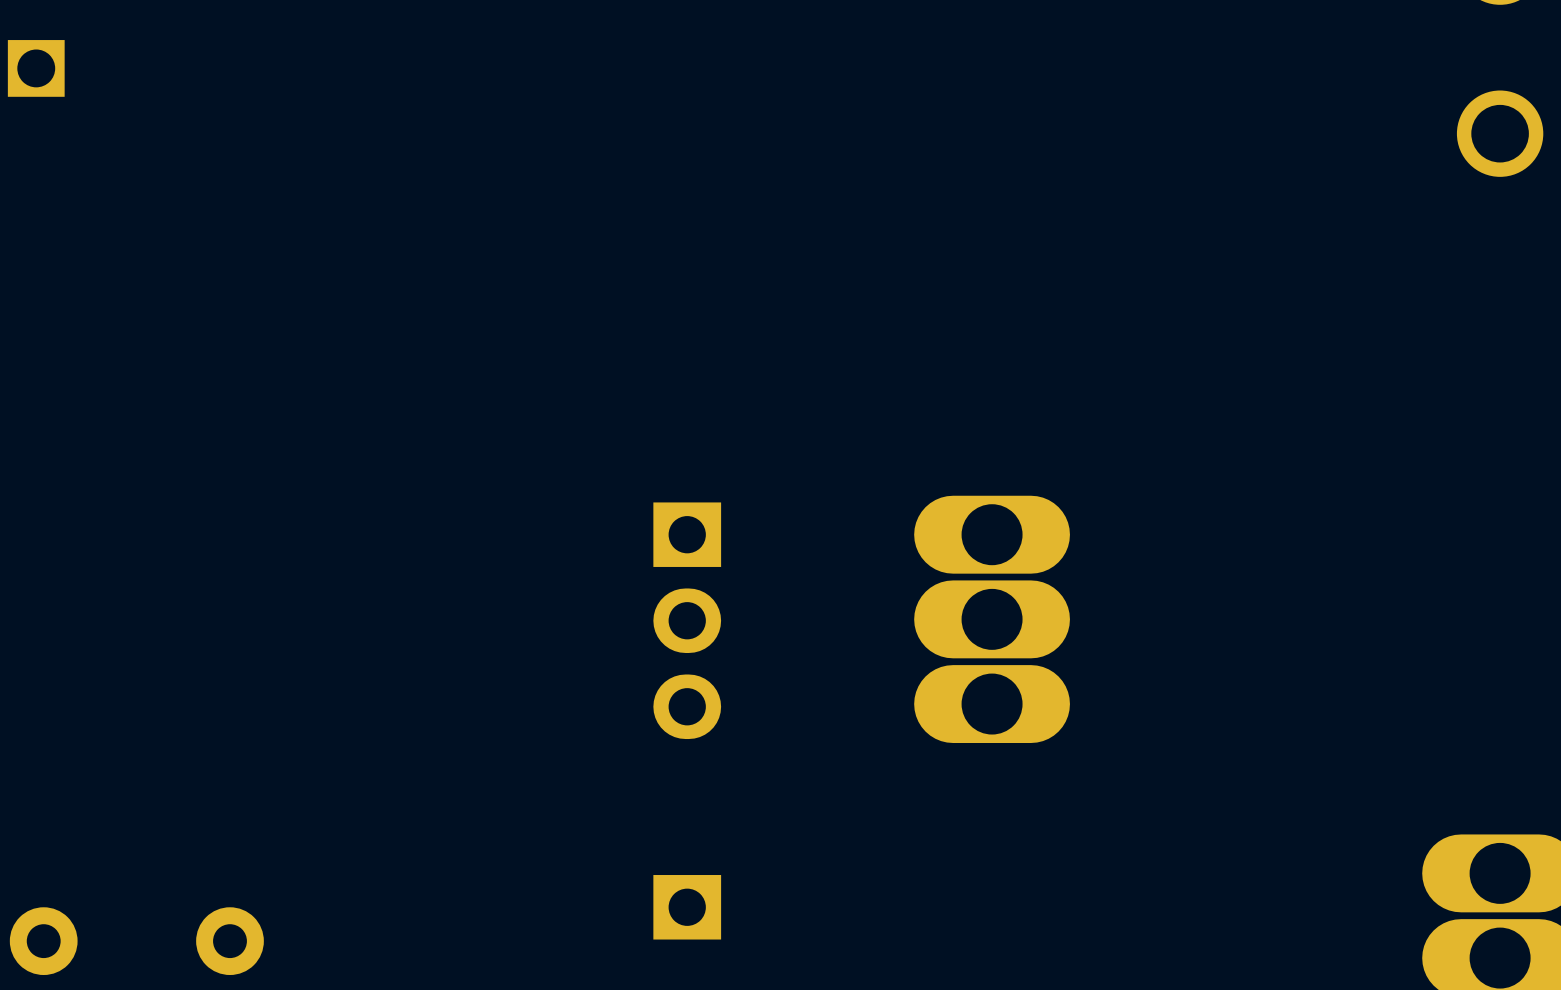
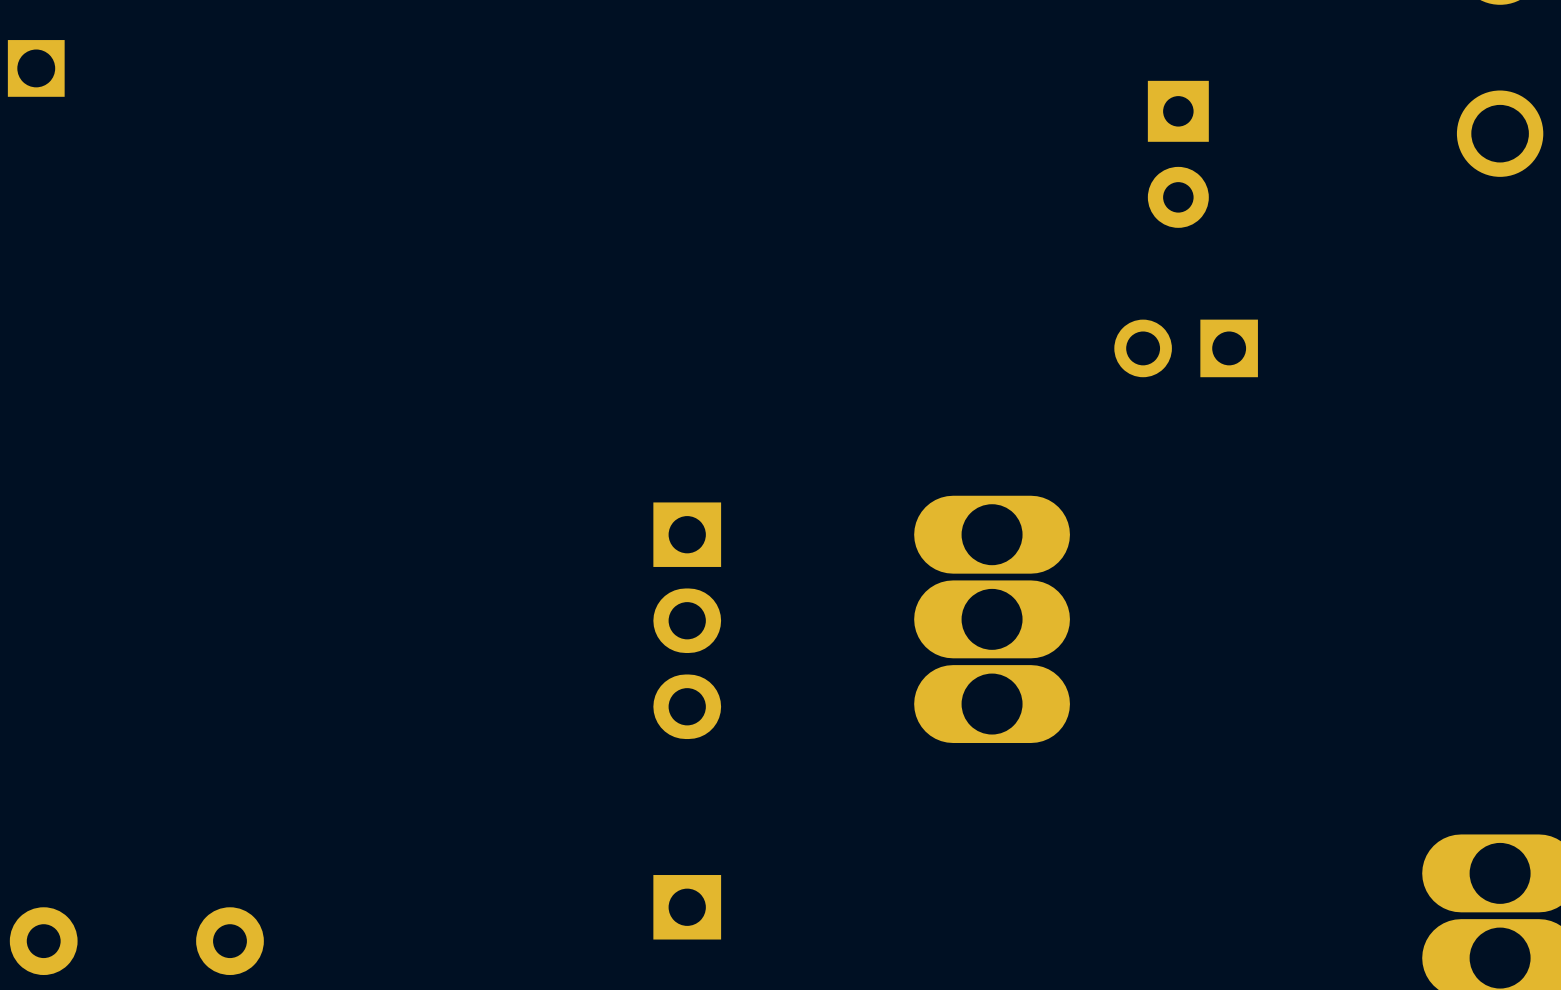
part: none -> (1178, 154)
part: none -> (1186, 348)

